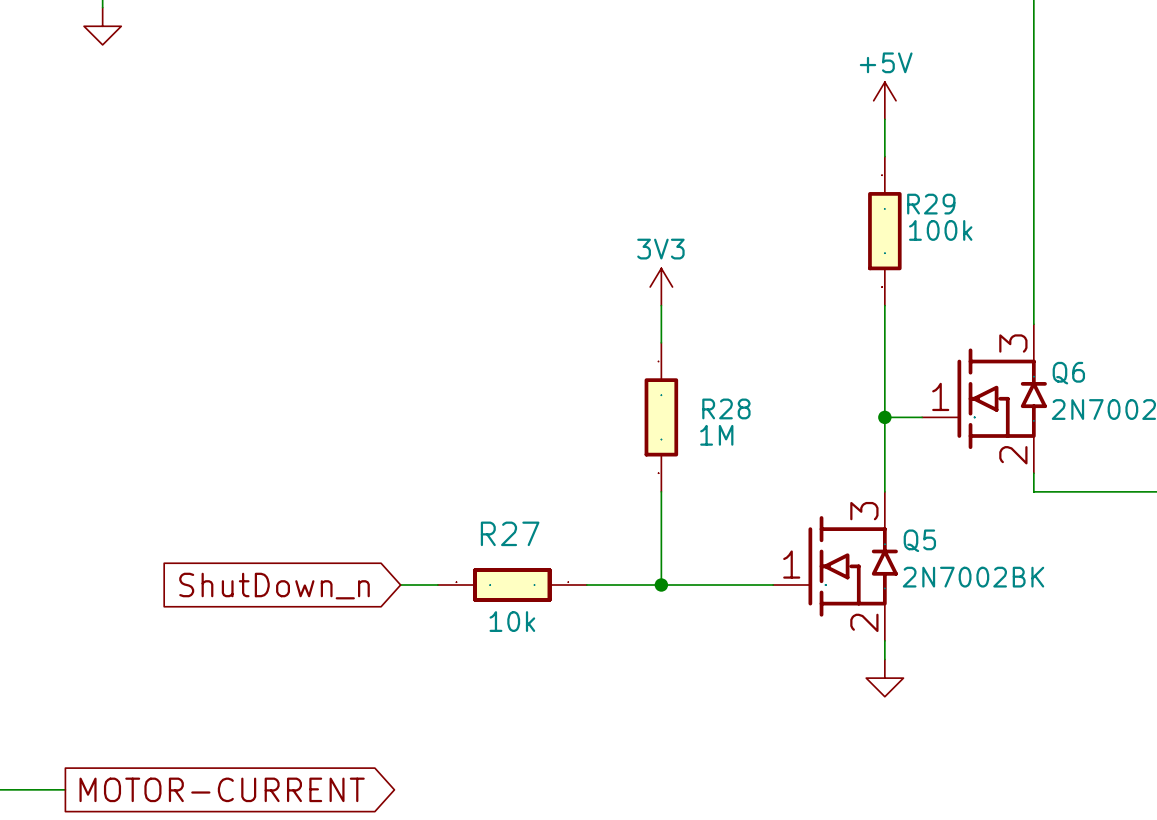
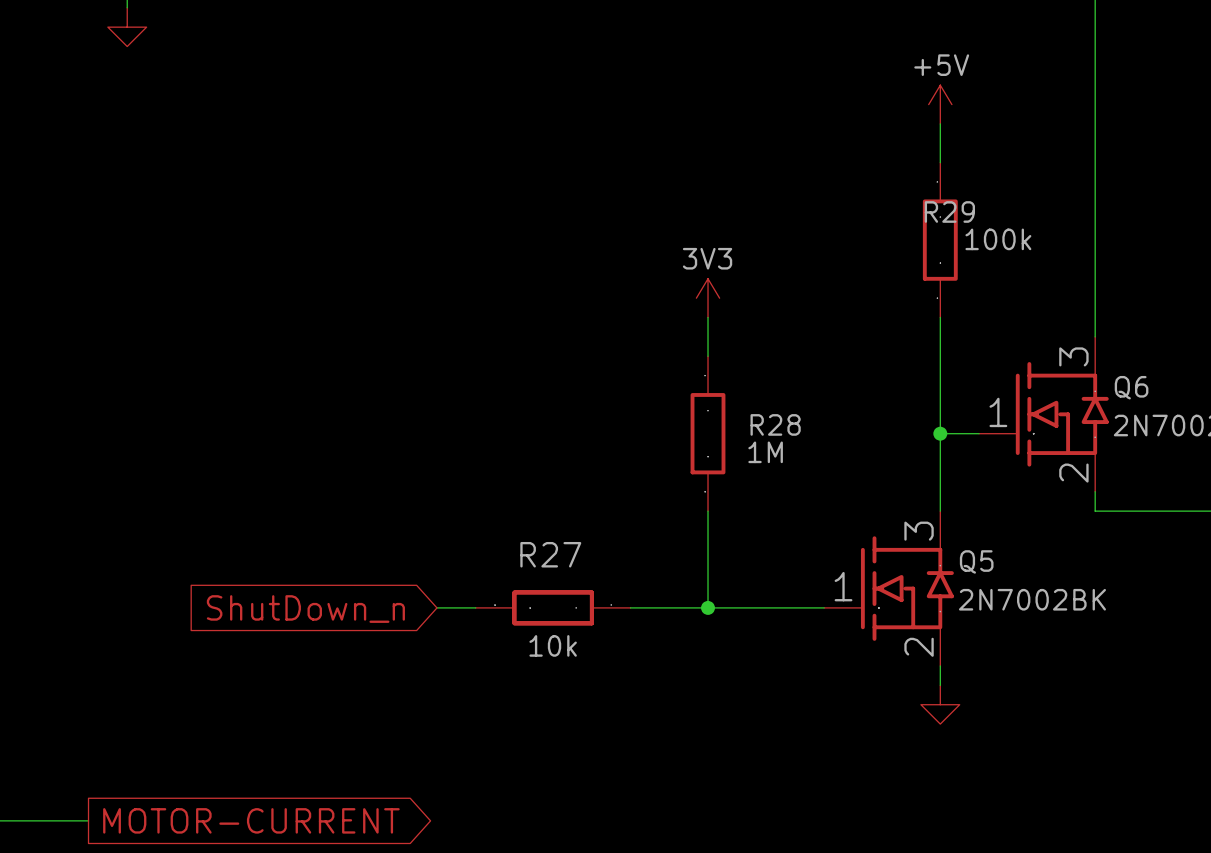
R29 name position: R29 (931, 204) -> R29 (949, 211)

